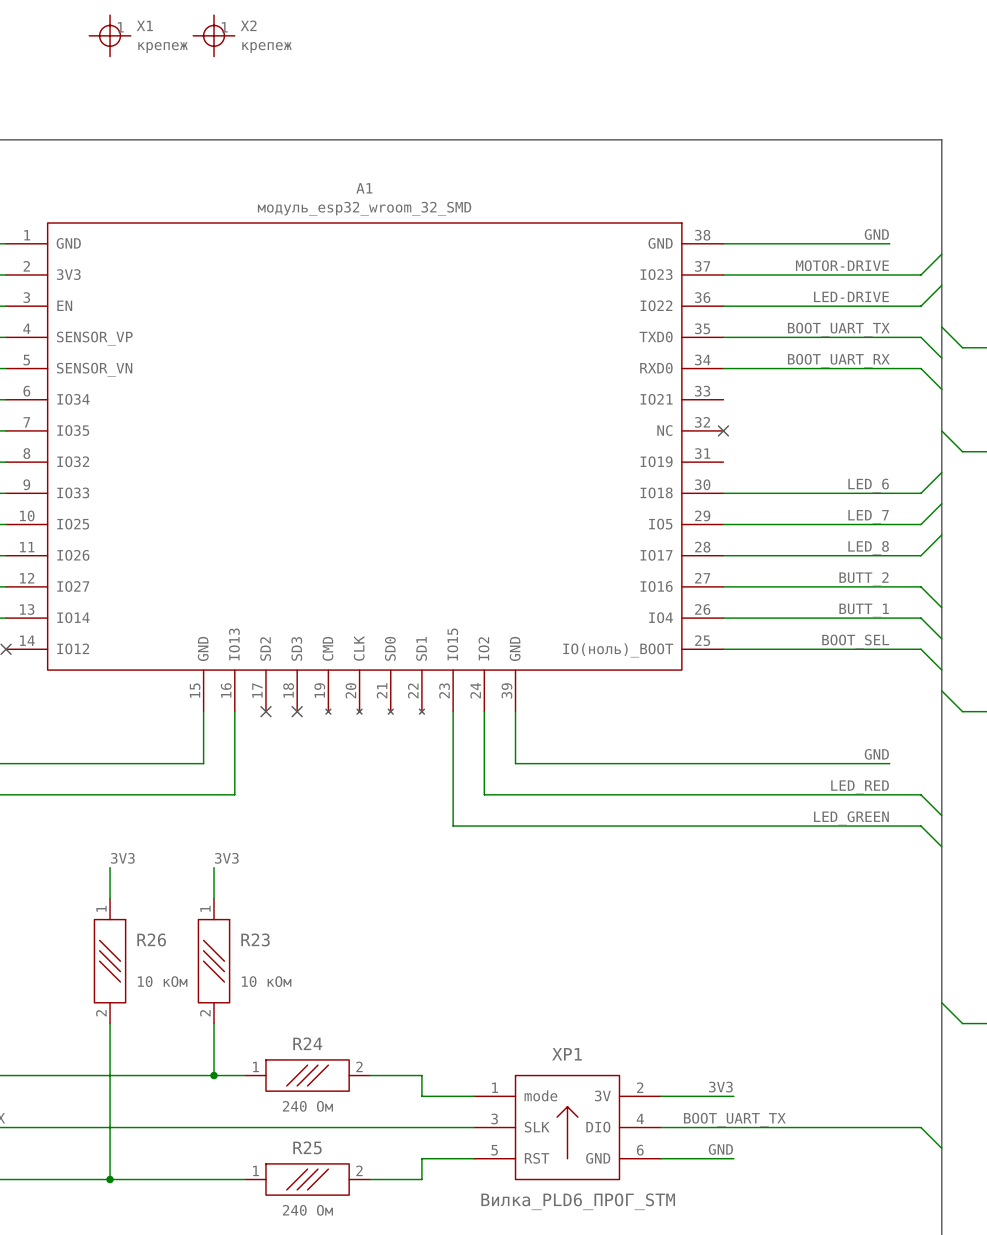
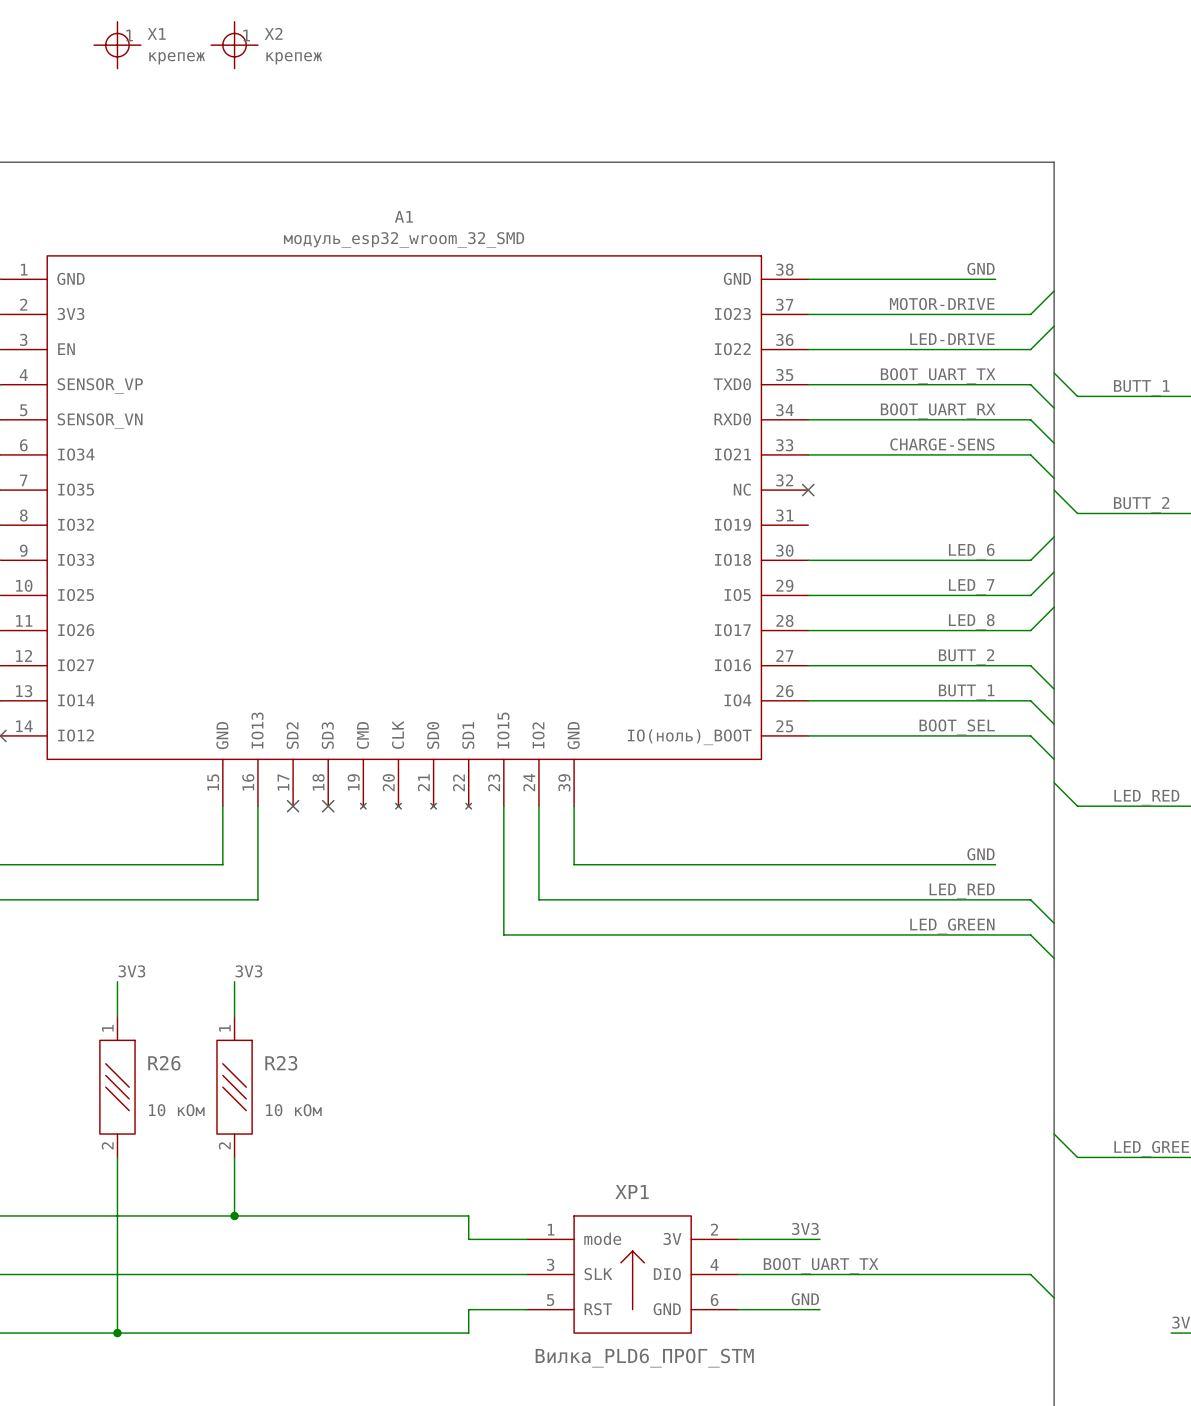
label: none -> CHARGE-SENS (942, 444)
wire: none -> (808, 454) (1030, 454) (1054, 478)
wire: none -> (269, 1215) (410, 1215)
R24: (307, 1075) -> none
wire: none -> (269, 1333) (410, 1333)
R25: (307, 1179) -> none

